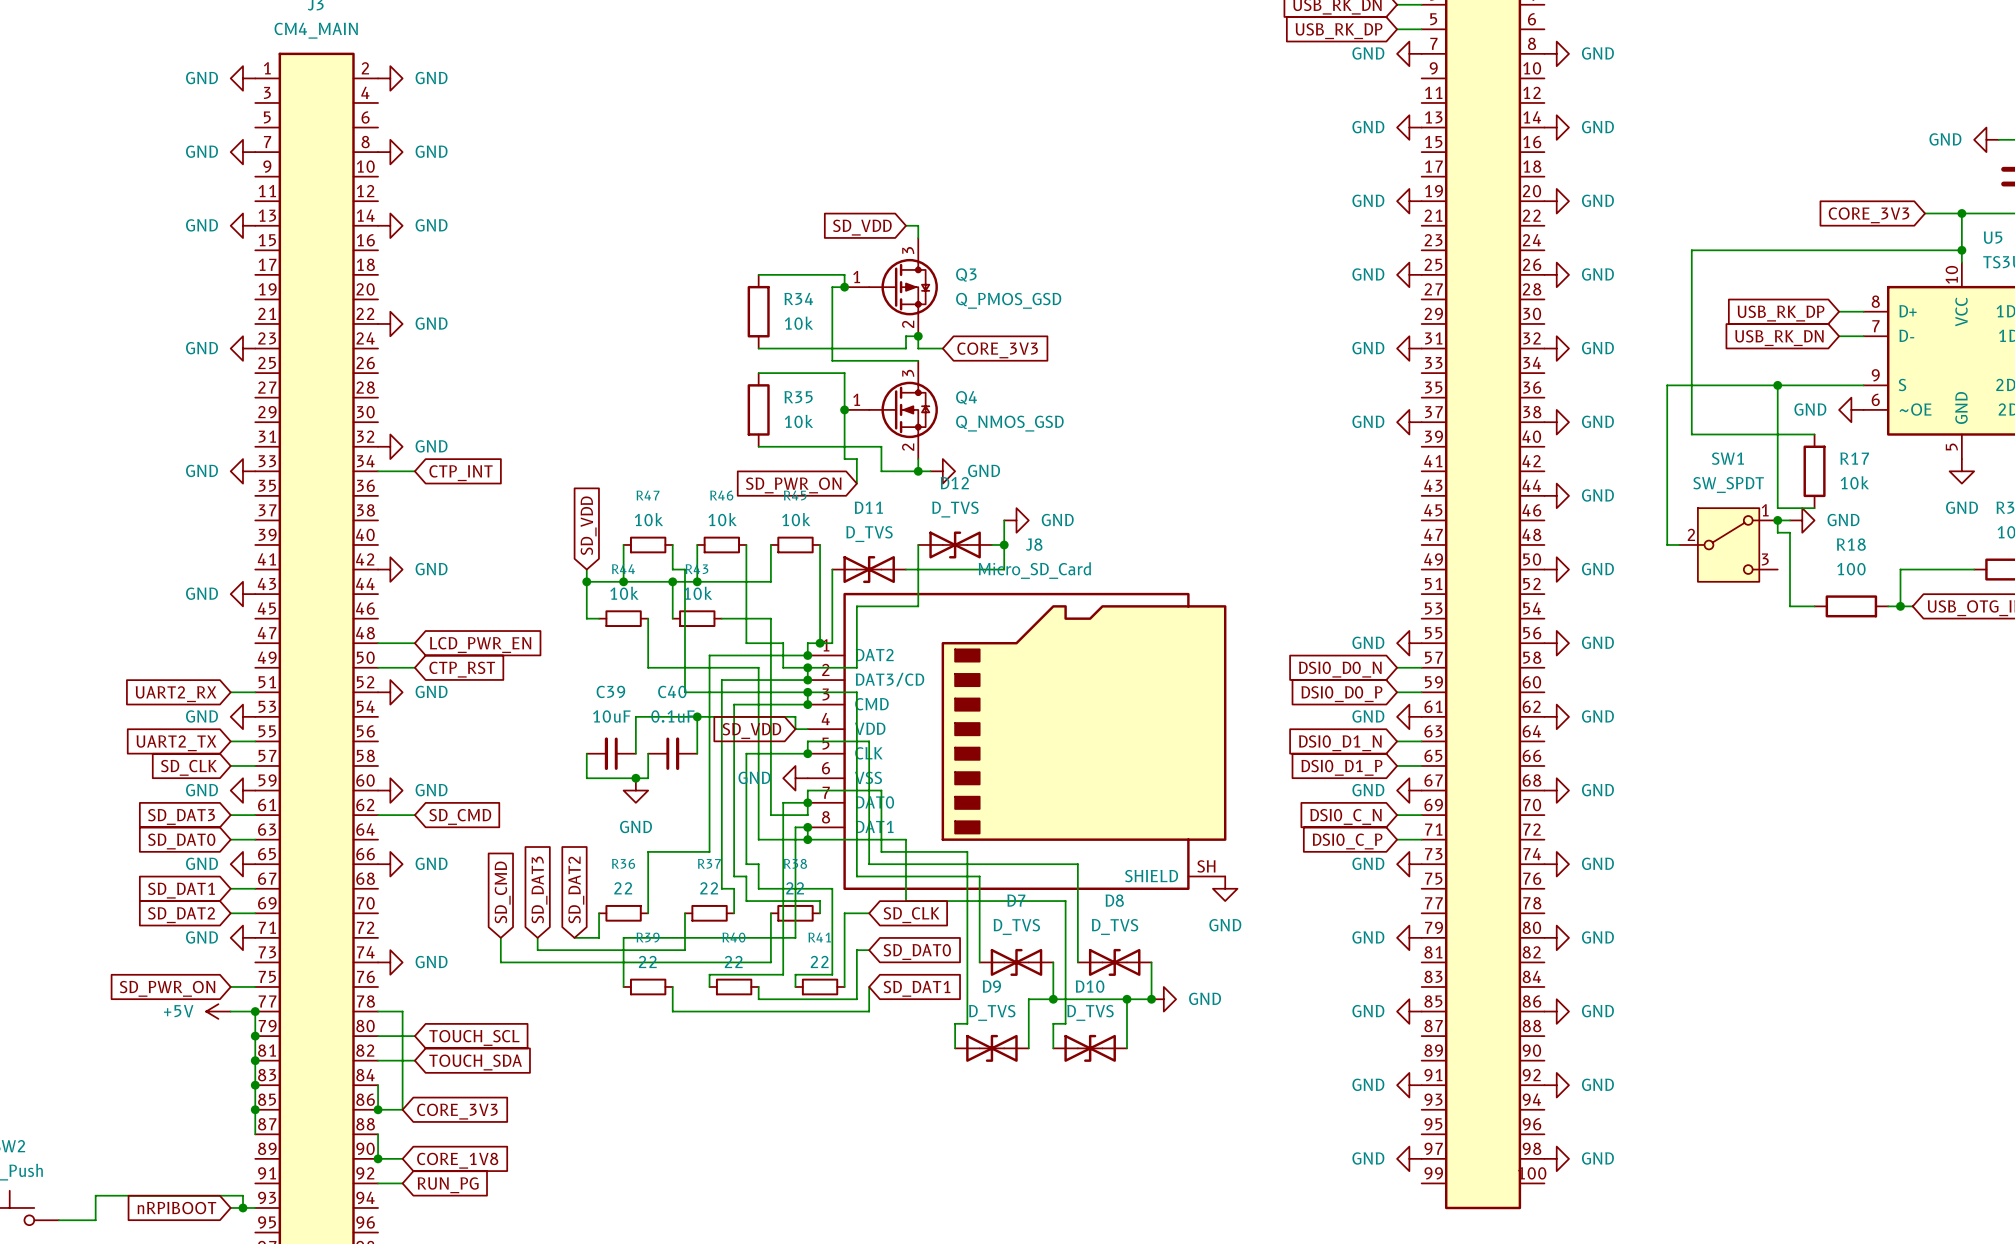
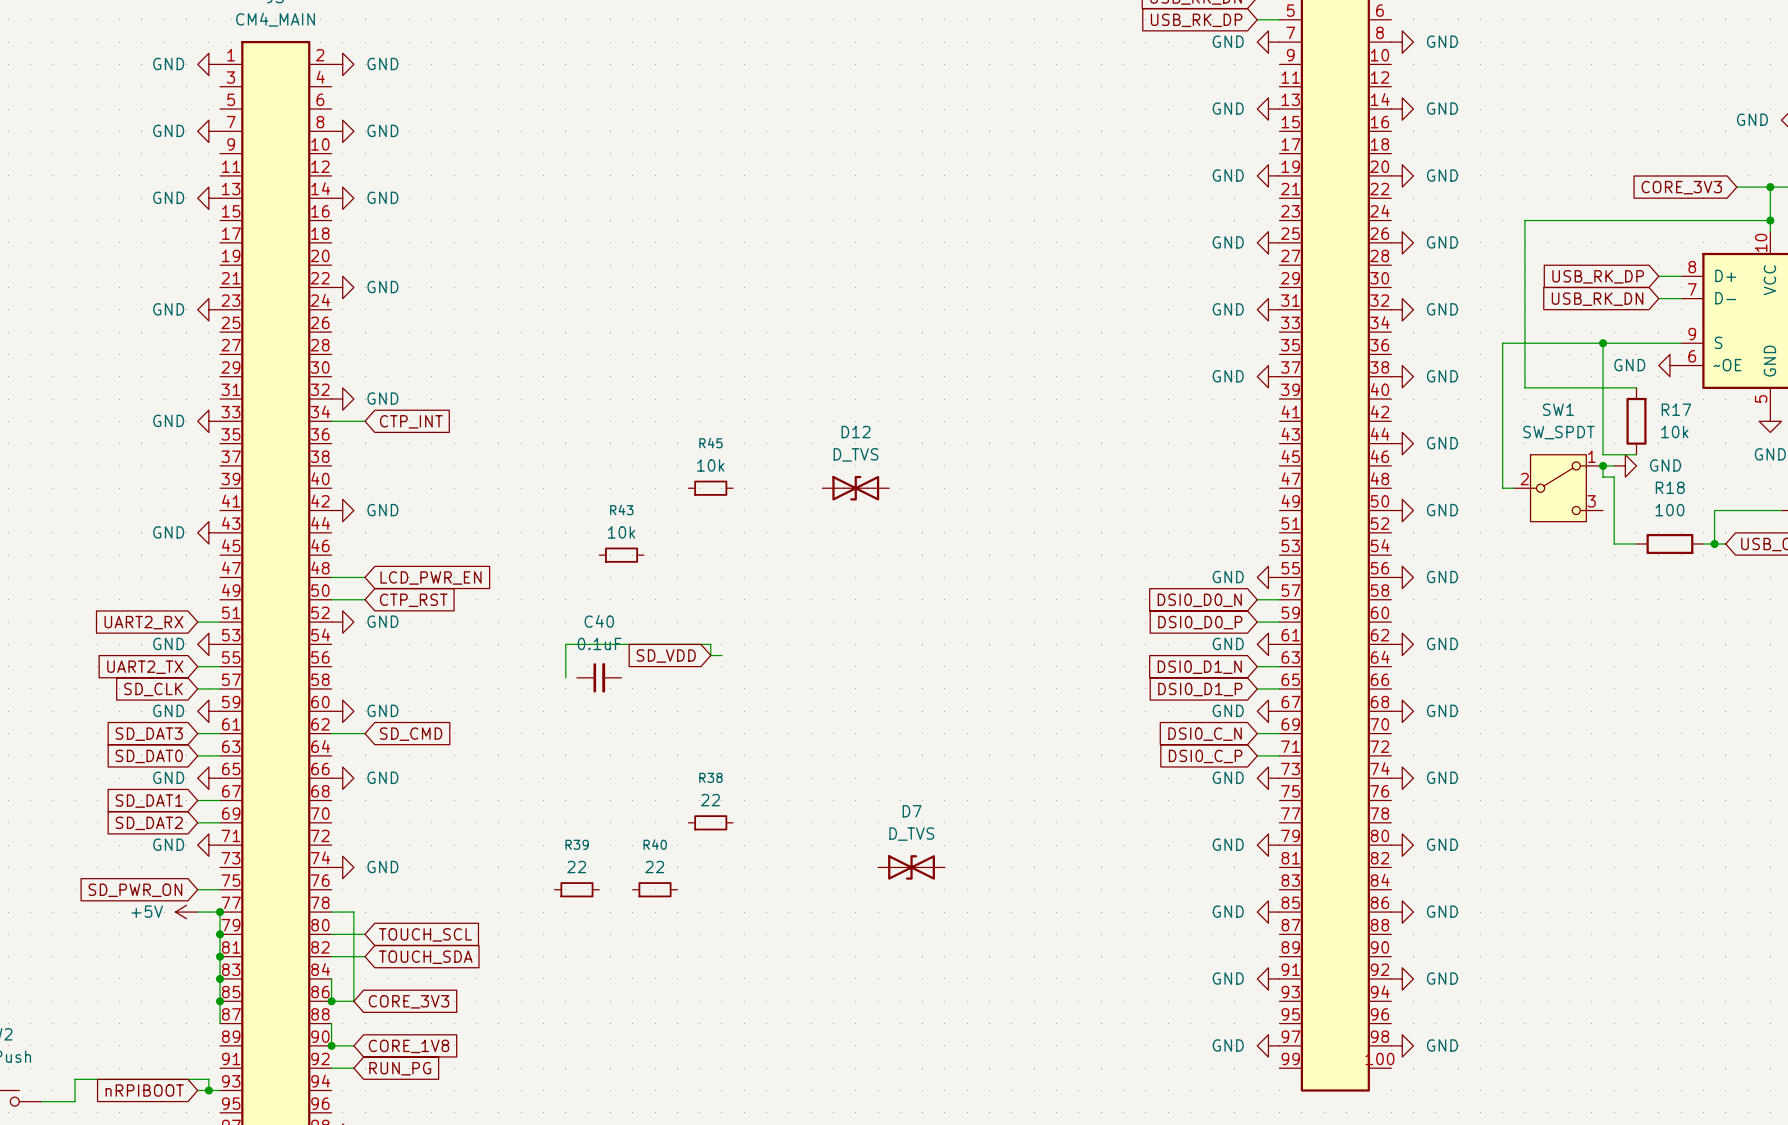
wire: (905, 225) (918, 225) (918, 238) -> none
global label: SD_VDD (862, 227) -> none
wire: (758, 274) (844, 274) (844, 287) (832, 287) (832, 360) (918, 360) -> none
junction: (844, 287) -> none
Q3: Q_PMOS_GSD (891, 287) -> none
R34: 10k (758, 311) -> none
junction: (918, 336) -> none
wire: (758, 348) (905, 348) (905, 336) (918, 336) (918, 348) (942, 348) -> none
global label: CORE_3V3 (997, 350) -> none
wire: (758, 373) (844, 373) (844, 459) (856, 459) (856, 483) -> none
R35: 10k (758, 409) -> none
junction: (844, 409) -> none
Q4: Q_NMOS_GSD (891, 409) -> none
wire: (758, 446) (881, 446) (881, 471) (930, 471) -> none
wire: (918, 459) (918, 471) -> none
junction: (918, 471) -> none
power symbol: GND (942, 471) -> none
global label: SD_PWR_ON (793, 485) -> none
wire: (1004, 520) (1004, 569) (905, 569) -> none
power symbol: GND (1016, 520) -> none
global label: SD_VDD (588, 525) -> none
wire: (623, 544) (623, 581) -> none
R47: 10k (648, 544) -> none
wire: (672, 544) (672, 569) (684, 569) (684, 692) (856, 692) (856, 876) (979, 876) (979, 962) -> none
wire: (697, 544) (697, 581) -> none
R46: 10k (721, 544) -> none
wire: (746, 544) (746, 643) (783, 643) (783, 667) (856, 667) (856, 606) (918, 606) (918, 544) -> none
wire: (770, 544) (770, 581) (586, 581) -> none
wire: (820, 544) (820, 643) -> none
wire: (991, 544) (1004, 544) -> none
junction: (1004, 544) -> none
wire: (586, 569) (586, 618) (599, 618) -> none
wire: (832, 569) (832, 643) (807, 643) (807, 655) (709, 655) (709, 851) (648, 851) (648, 913) -> none
D11: D_TVS (869, 569) -> none
junction: (586, 581) -> none
junction: (623, 581) -> none
wire: (672, 581) (672, 618) -> none
junction: (672, 581) -> none
junction: (697, 581) -> none
R44: 10k (623, 618) -> none
wire: (648, 618) (648, 667) (758, 667) (758, 839) (905, 839) (905, 901) (1065, 901) (1065, 1023) (1053, 1023) (1053, 1048) -> none
wire: (721, 618) (770, 618) (770, 815) (807, 815) (807, 790) (881, 790) (881, 851) (967, 851) (967, 1023) (955, 1023) (955, 1048) -> none
junction: (820, 643) -> none
junction: (807, 655) -> none
wire: (807, 667) (807, 680) (721, 680) (721, 888) (734, 888) (734, 913) -> none
junction: (807, 667) -> none
junction: (807, 680) -> none
wire: (807, 692) (807, 704) (734, 704) (734, 876) (746, 876) (746, 901) (820, 901) (820, 913) -> none
junction: (807, 692) -> none
junction: (807, 704) -> none
wire: (697, 716) (697, 753) -> none
junction: (697, 716) -> none
J8: Micro_SD_Card (1017, 741) -> none
wire: (586, 753) (586, 778) (648, 778) (648, 753) -> none
C39: 10uF (611, 753) -> none
junction: (807, 753) -> none
junction: (635, 778) -> none
power symbol: GND (795, 778) -> none
power symbol: GND (635, 790) -> none
wire: (807, 802) (783, 802) (783, 974) (709, 974) (709, 986) -> none
junction: (807, 802) -> none
junction: (807, 827) -> none
wire: (807, 839) (807, 827) (795, 827) (795, 937) (623, 937) (623, 986) -> none
junction: (807, 839) -> none
power symbol: GND (1225, 888) -> none
global label: SD_DAT3 (539, 889) -> none
global label: SD_DAT2 (576, 889) -> none
global label: SD_CMD (502, 892) -> none
wire: (599, 913) (599, 937) (574, 937) -> none
R36: 22 (623, 913) -> none
wire: (684, 913) (684, 950) (537, 950) (537, 937) -> none
R37: 22 (709, 913) -> none
wire: (770, 913) (770, 962) (500, 962) (500, 937) -> none
wire: (869, 913) (844, 913) (844, 986) -> none
global label: SD_CLK (911, 915) -> none
wire: (869, 950) (856, 950) (856, 999) (758, 999) (758, 986) -> none
global label: SD_DAT0 (917, 951) -> none
wire: (1053, 962) (1053, 999) -> none
wire: (1077, 962) (1077, 864) (869, 864) (869, 741) (807, 741) (807, 753) (746, 753) (746, 864) (758, 864) (758, 888) (832, 888) (832, 974) (795, 974) (795, 986) -> none
D8: D_TVS (1114, 962) -> none
wire: (1151, 962) (1151, 999) (1028, 999) (1028, 1048) -> none
wire: (672, 986) (672, 1011) (869, 1011) (869, 986) -> none
R41: 22 (820, 986) -> none
global label: SD_DAT1 (917, 988) -> none
junction: (1053, 999) -> none
wire: (1126, 999) (1126, 1048) -> none
junction: (1126, 999) -> none
junction: (1151, 999) -> none
power symbol: GND (1163, 999) -> none
D9: D_TVS (991, 1048) -> none
D10: D_TVS (1090, 1048) -> none

